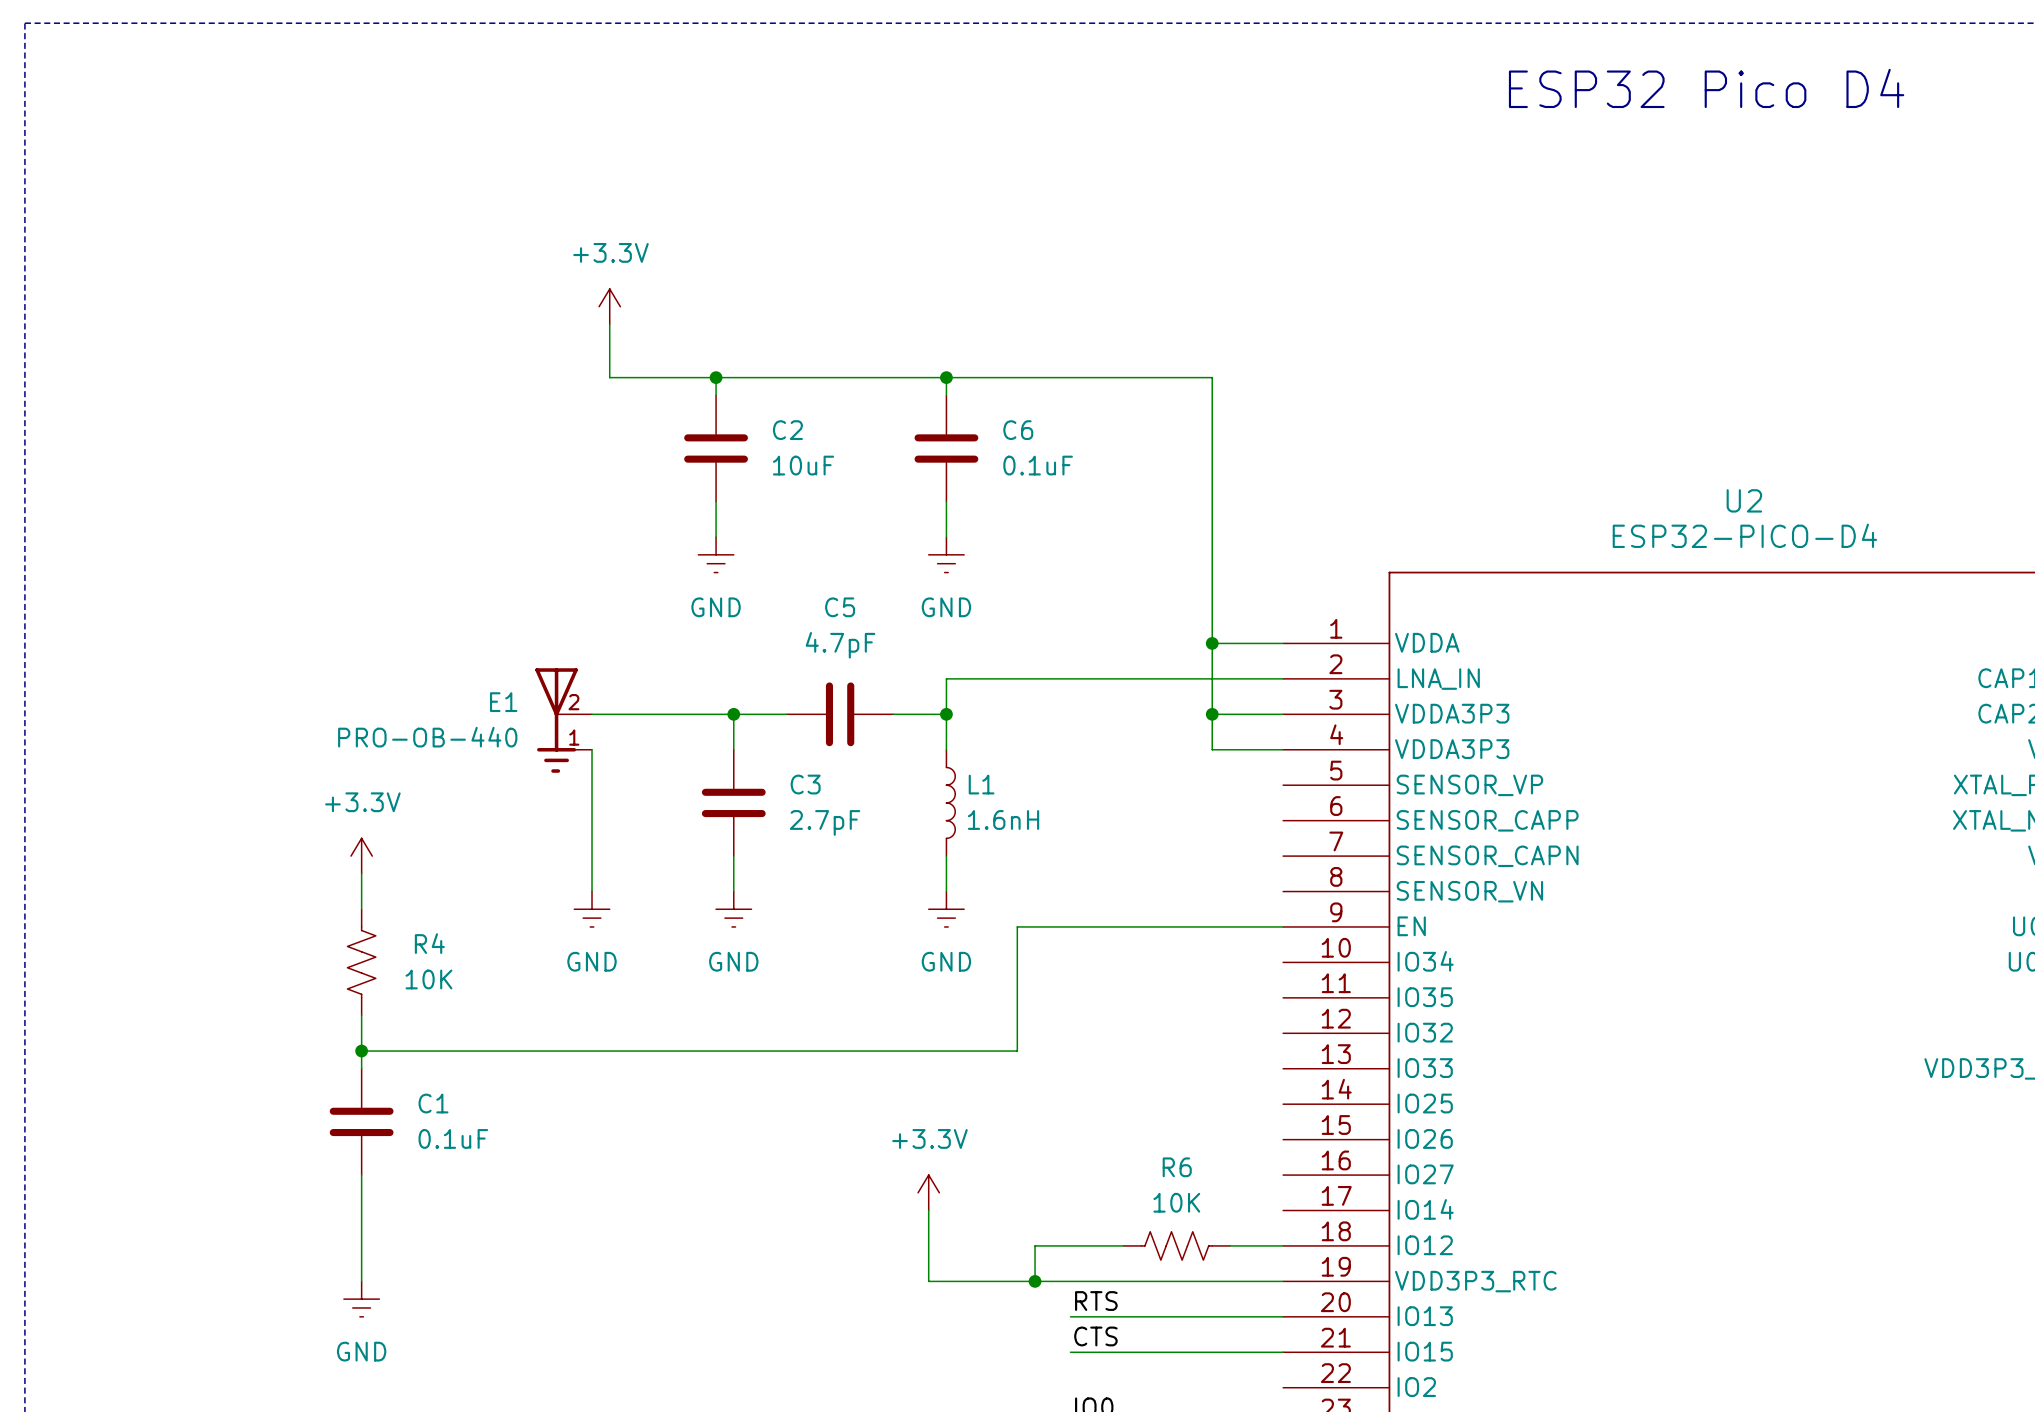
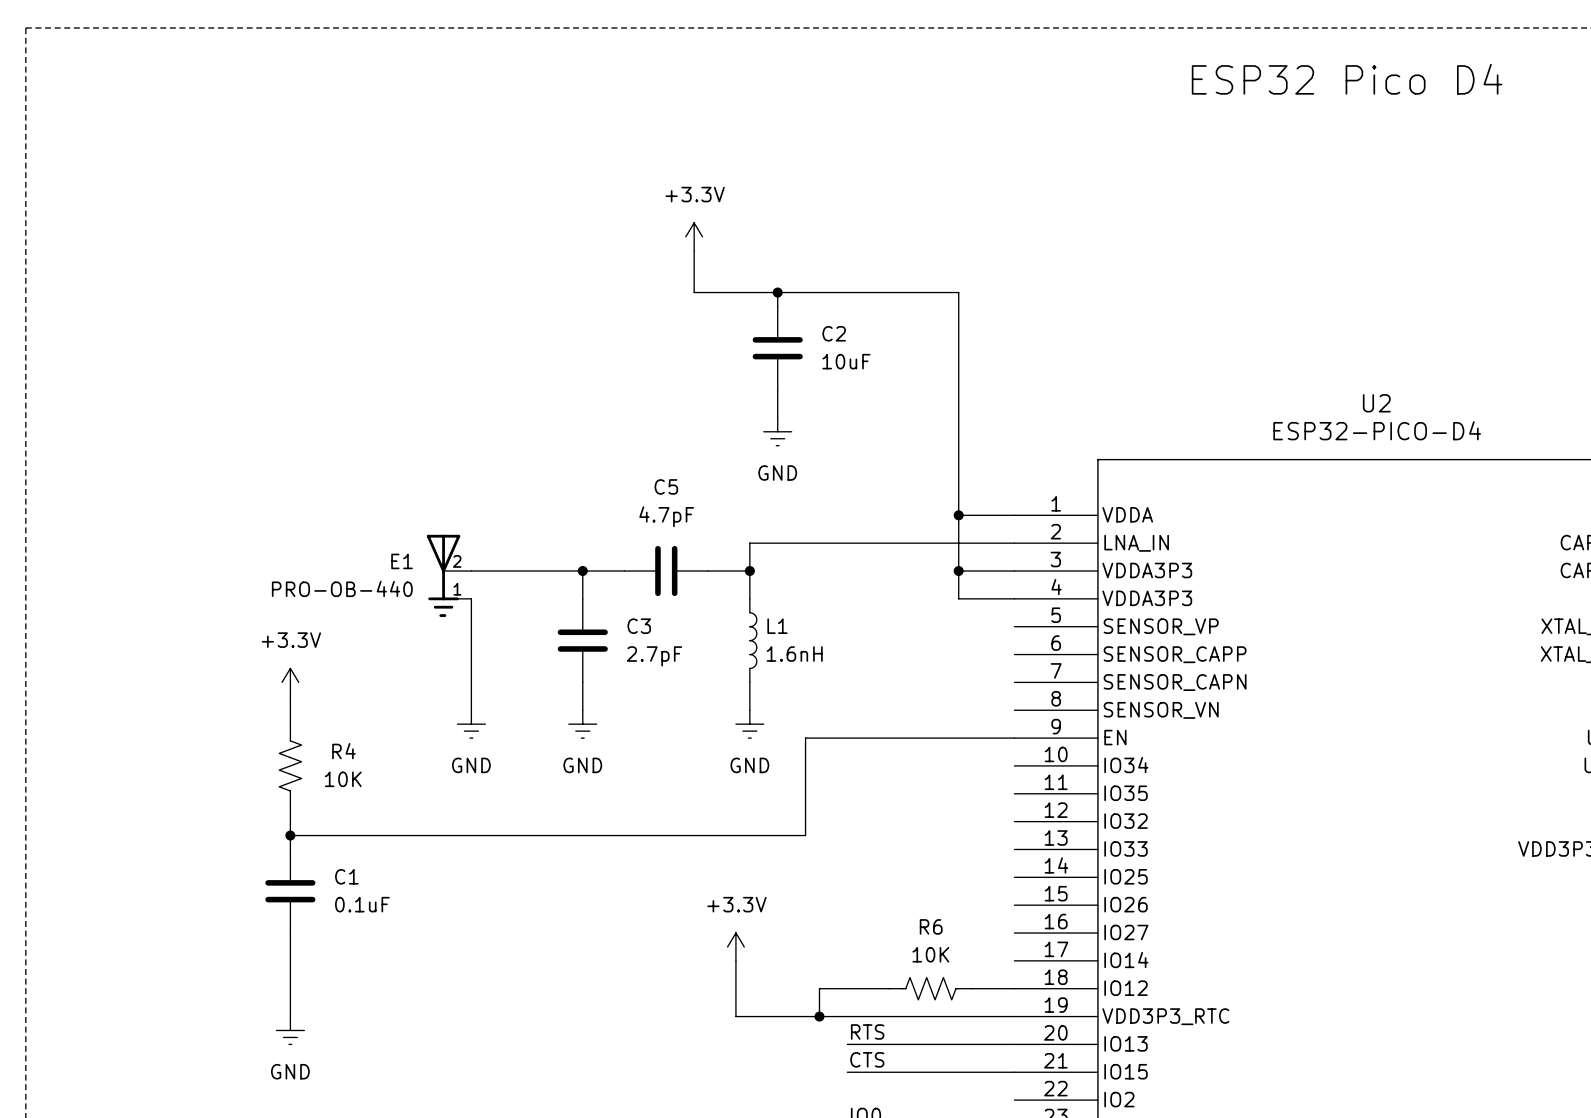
power symbol position: +3.3V (609, 306) -> +3.3V (694, 236)
wire: (609, 324) (609, 377) (1212, 377) -> (694, 250) (694, 292) (958, 292) (958, 306)
wire: (716, 377) (716, 395) -> none
junction: (716, 377) -> none
wire: (946, 377) (946, 395) -> (777, 292) (777, 306)
junction position: (946, 377) -> (777, 292)
C2 position: (716, 448) -> (777, 348)
C6: 0.1uF (946, 448) -> none
wire: (716, 501) (716, 537) -> none
wire: (946, 501) (946, 537) -> (777, 390) (777, 417)
power symbol: GND (716, 554) -> none
power symbol position: GND (946, 554) -> GND (777, 431)

